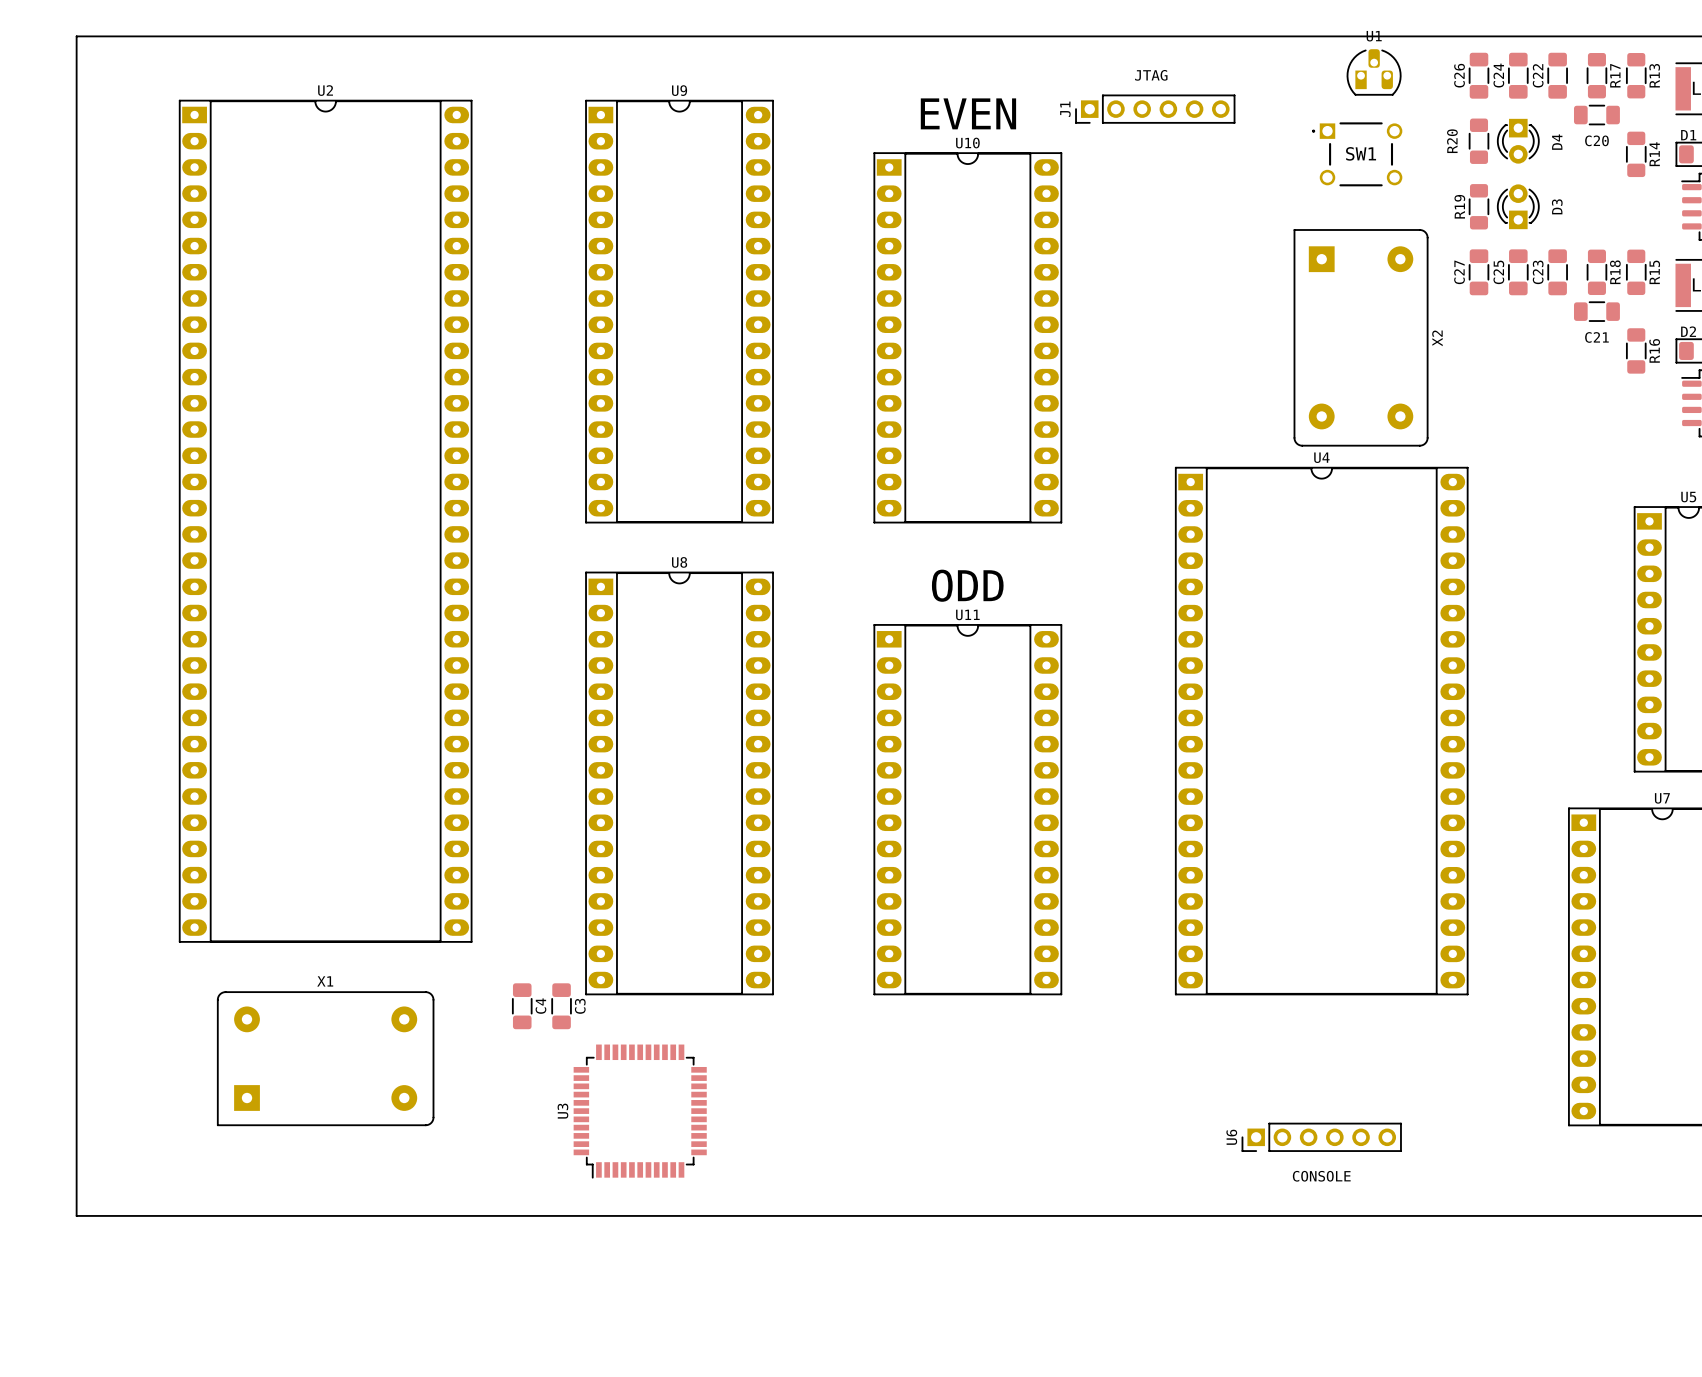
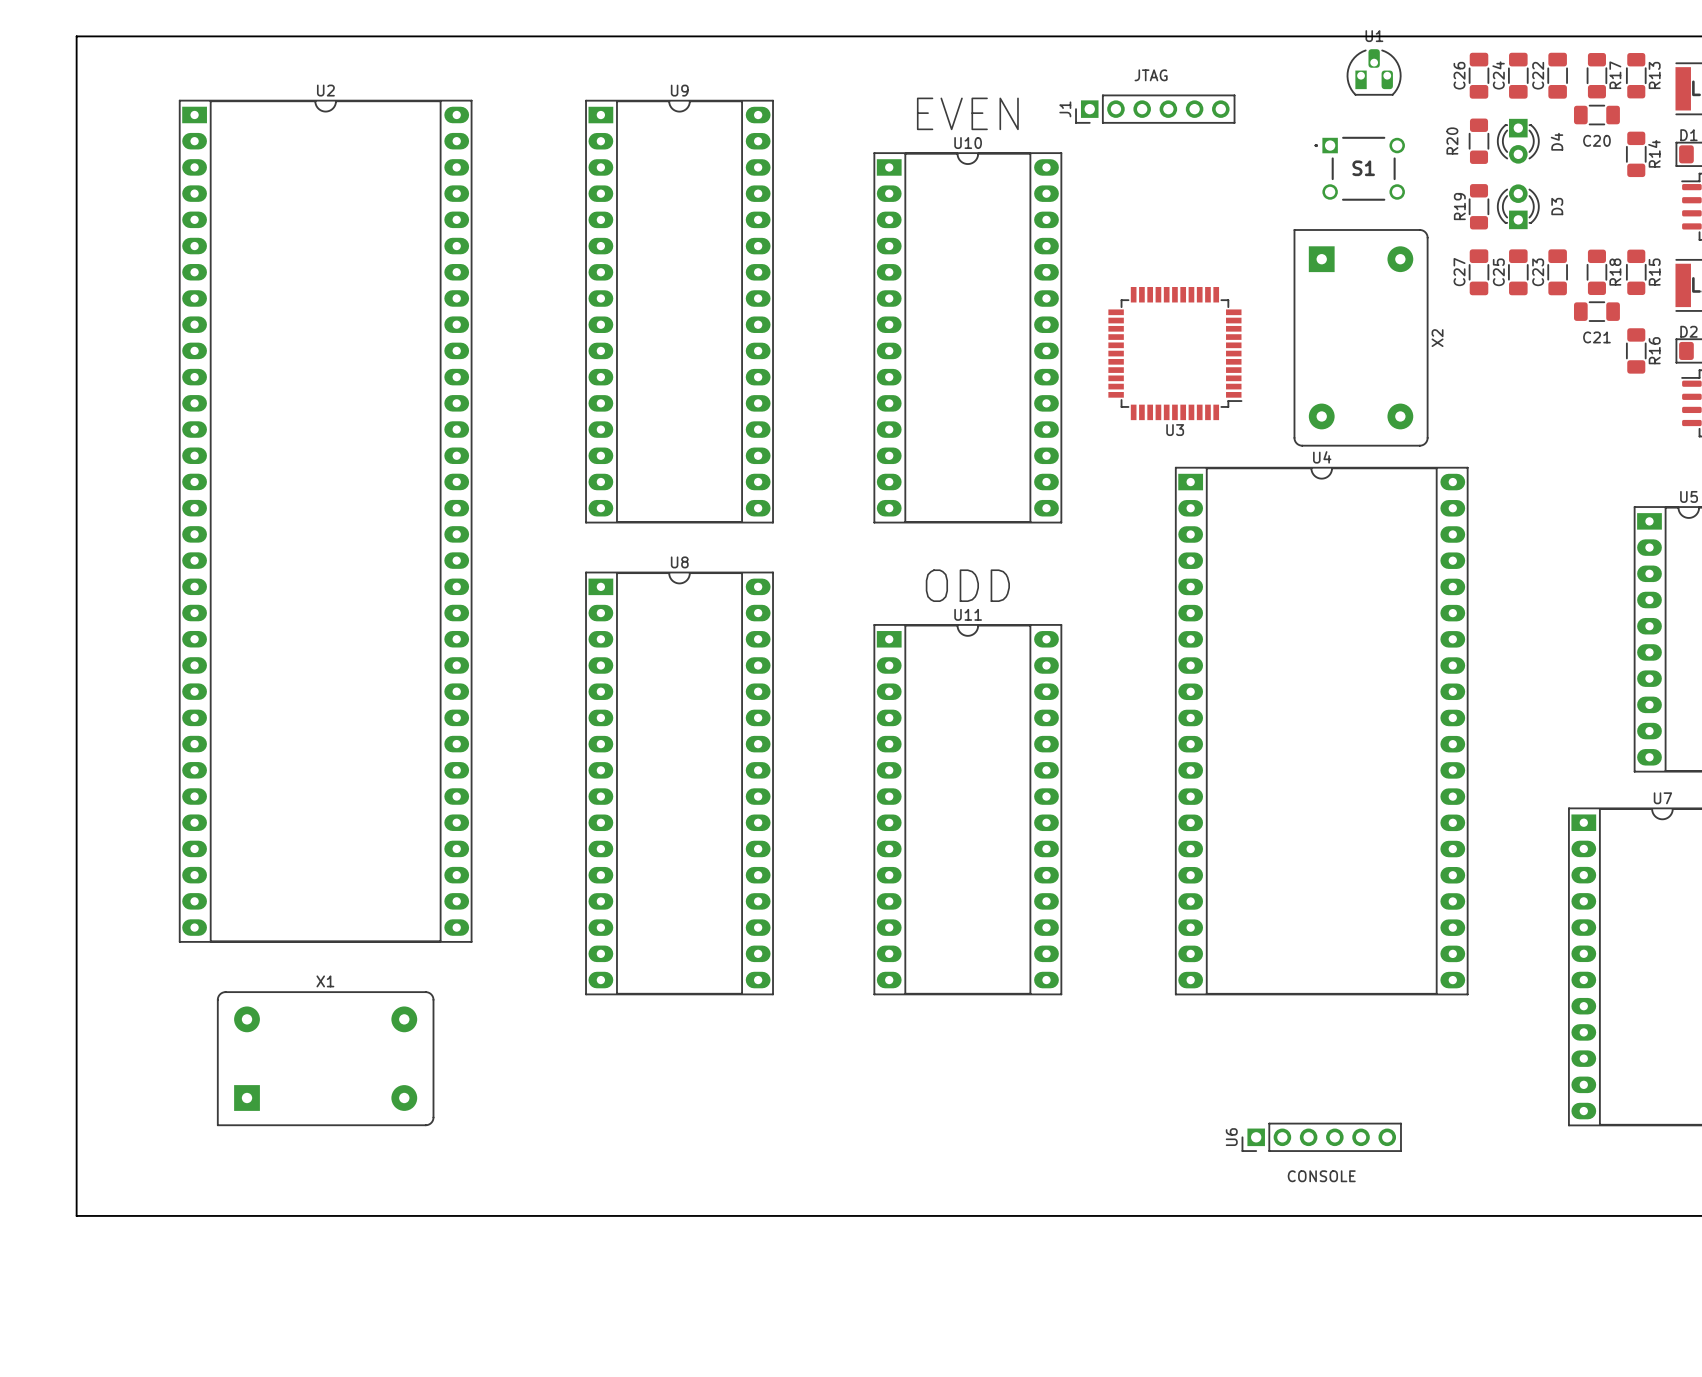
SW1: (1357, 154) -> none
S1: none -> (1359, 168)
C4: (522, 1006) -> none
C3: (561, 1006) -> none
U3 rotation: 0° (640, 1111) -> 90° counterclockwise (1175, 353)
U3 position: (640, 1111) -> (1175, 353)

